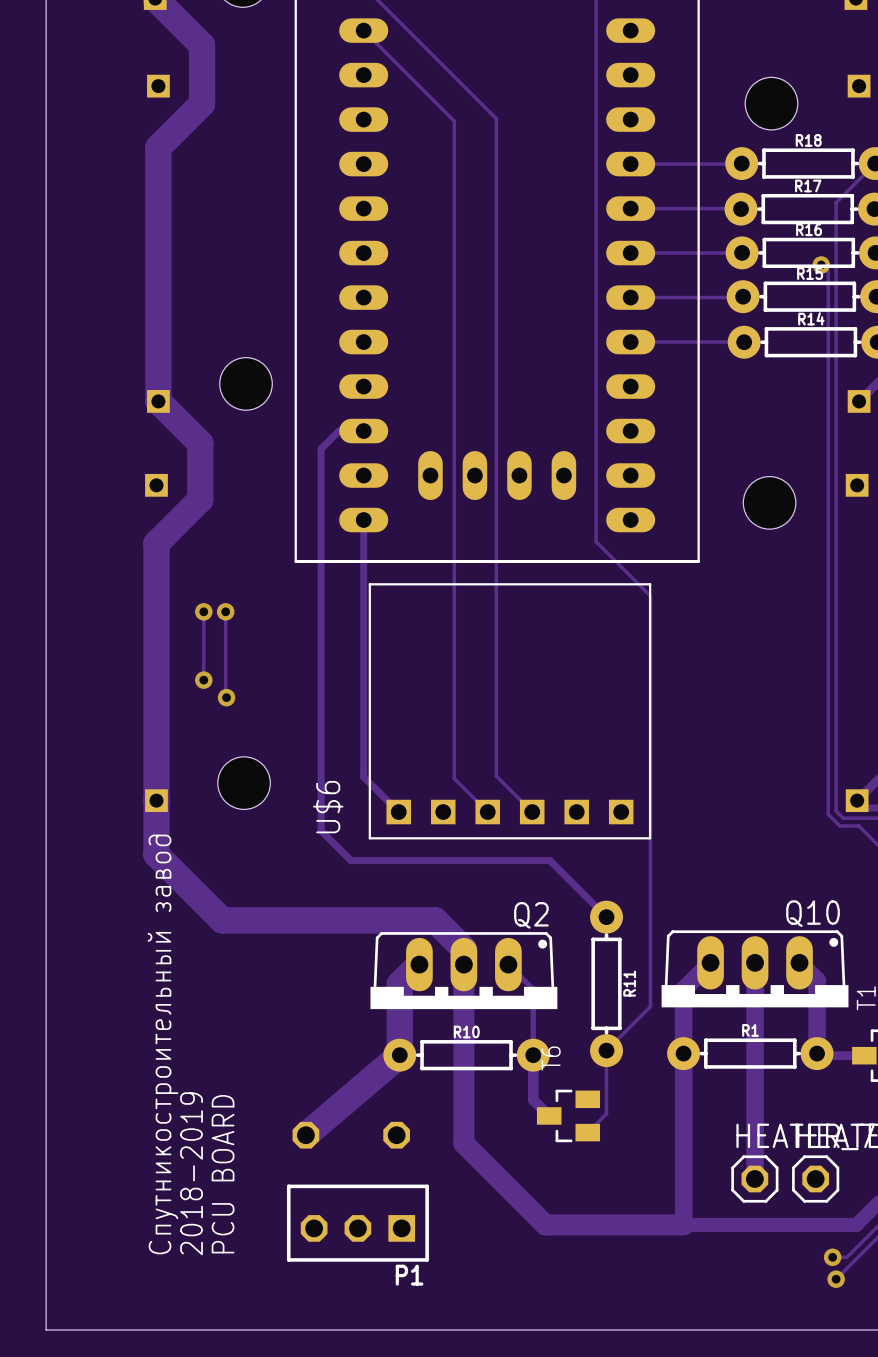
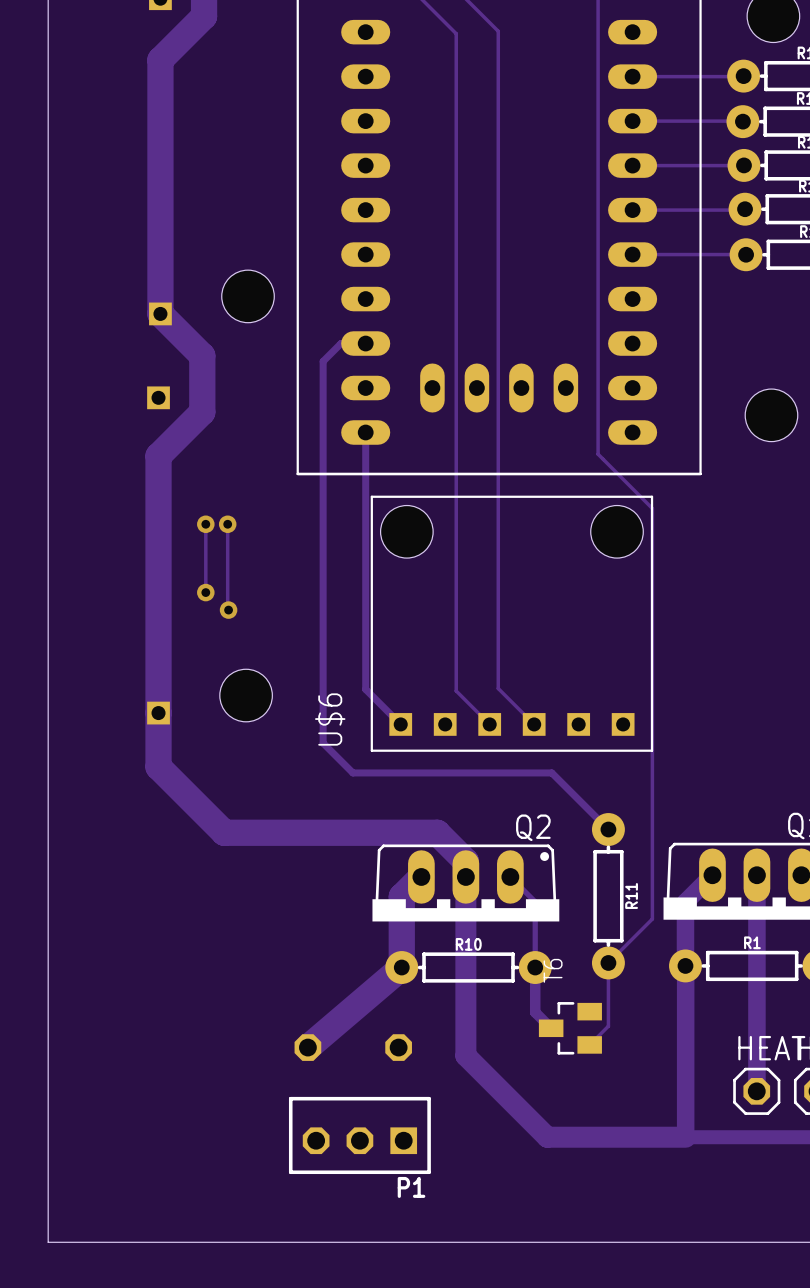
U$6 footprint: [368, 583, 652, 840] -> [370, 495, 654, 752]
text: Спутникостроительный завод (162, 1044) -> none
text: 2018-2019 (191, 1173) -> none
text: PCU BOARD (223, 1174) -> none

